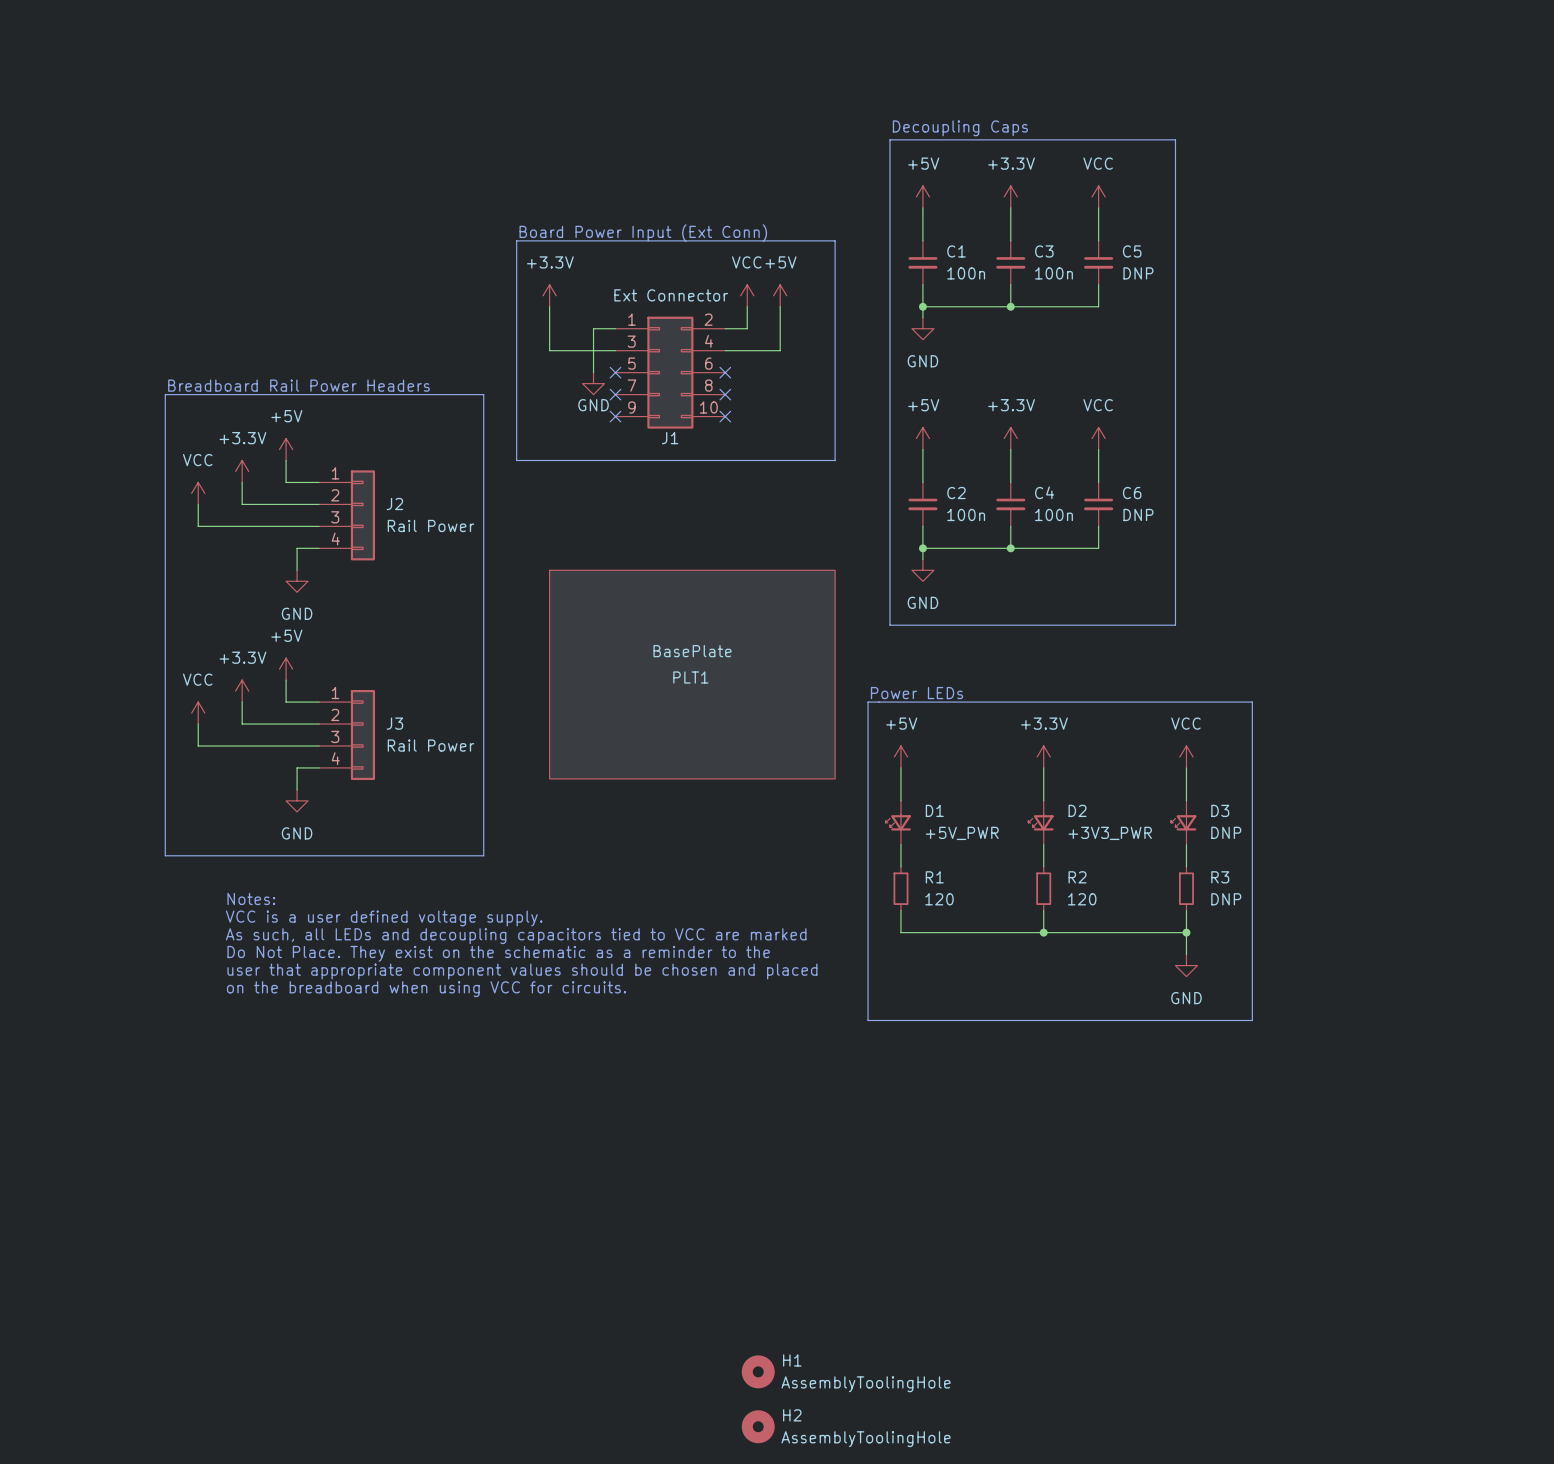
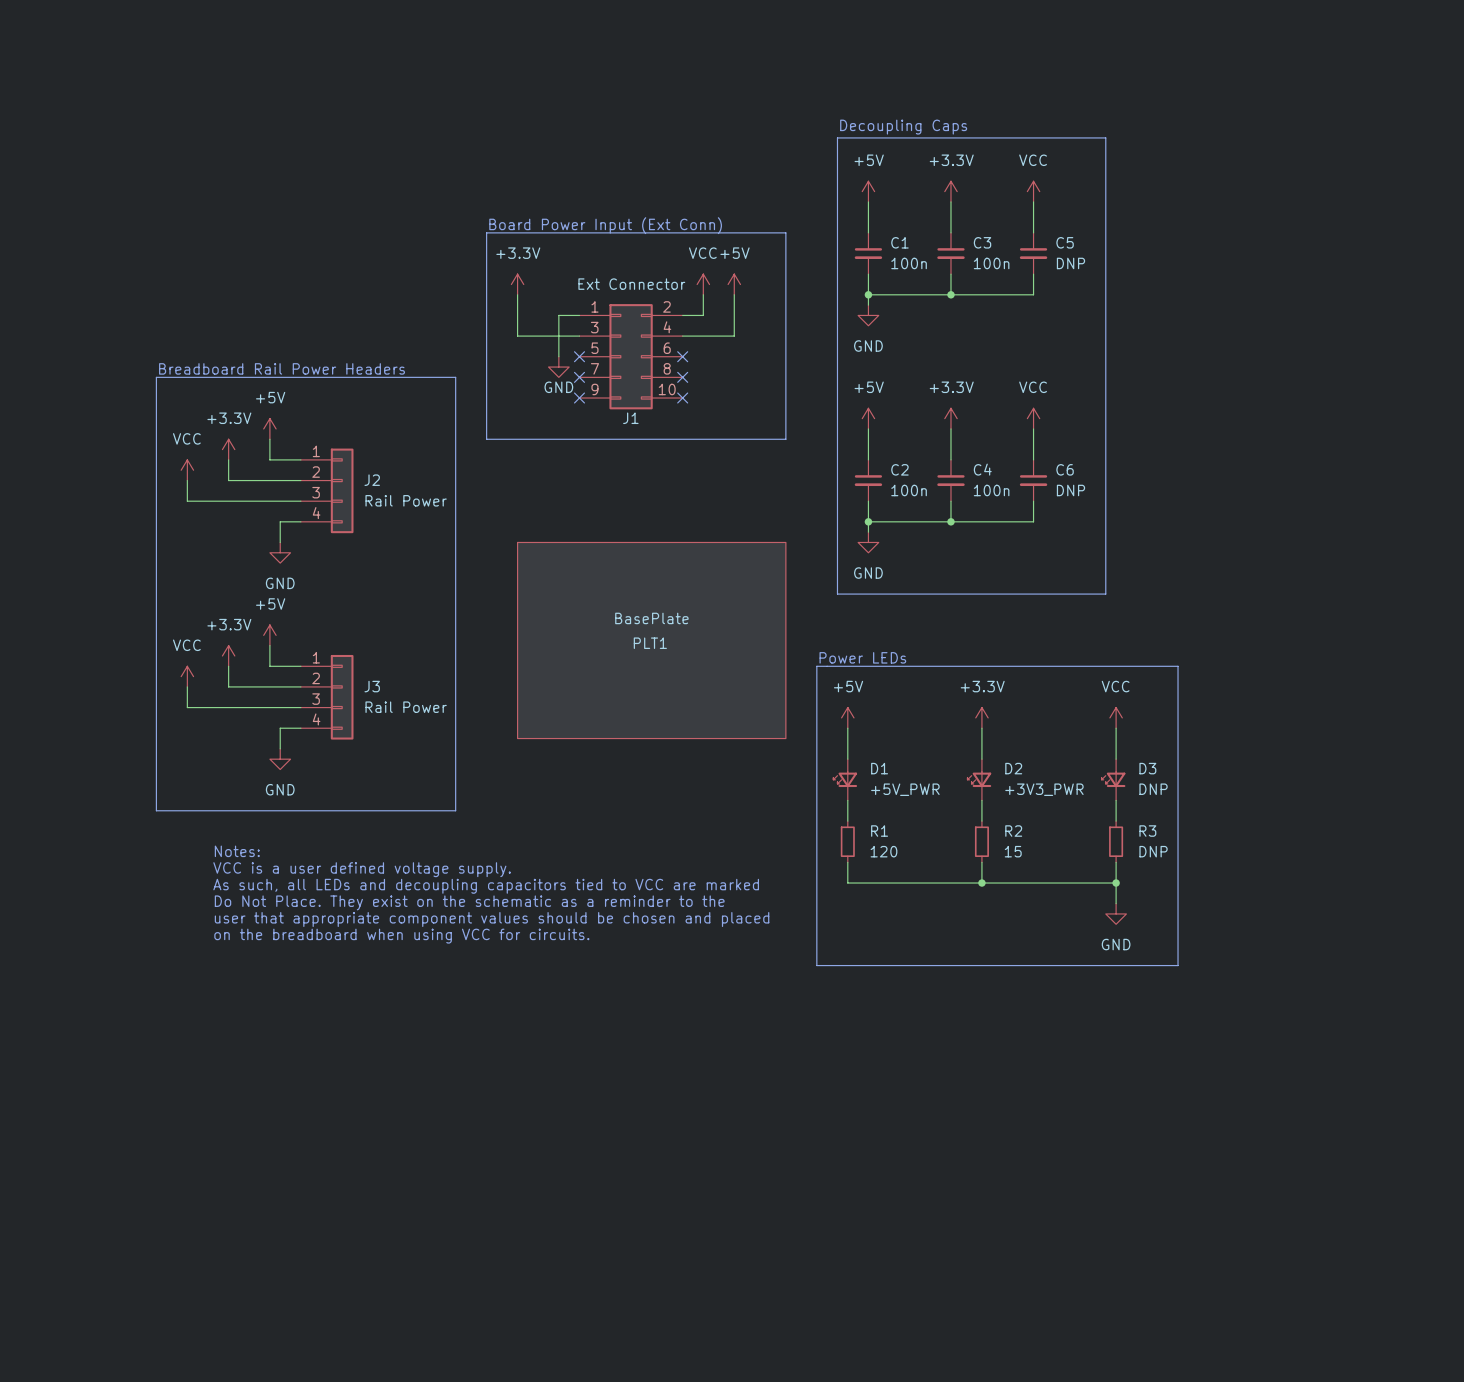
R2 value: 120 (1082, 899) -> 15 (1013, 851)
H1: AssemblyToolingHole (758, 1371) -> none
H2: AssemblyToolingHole (758, 1426) -> none

